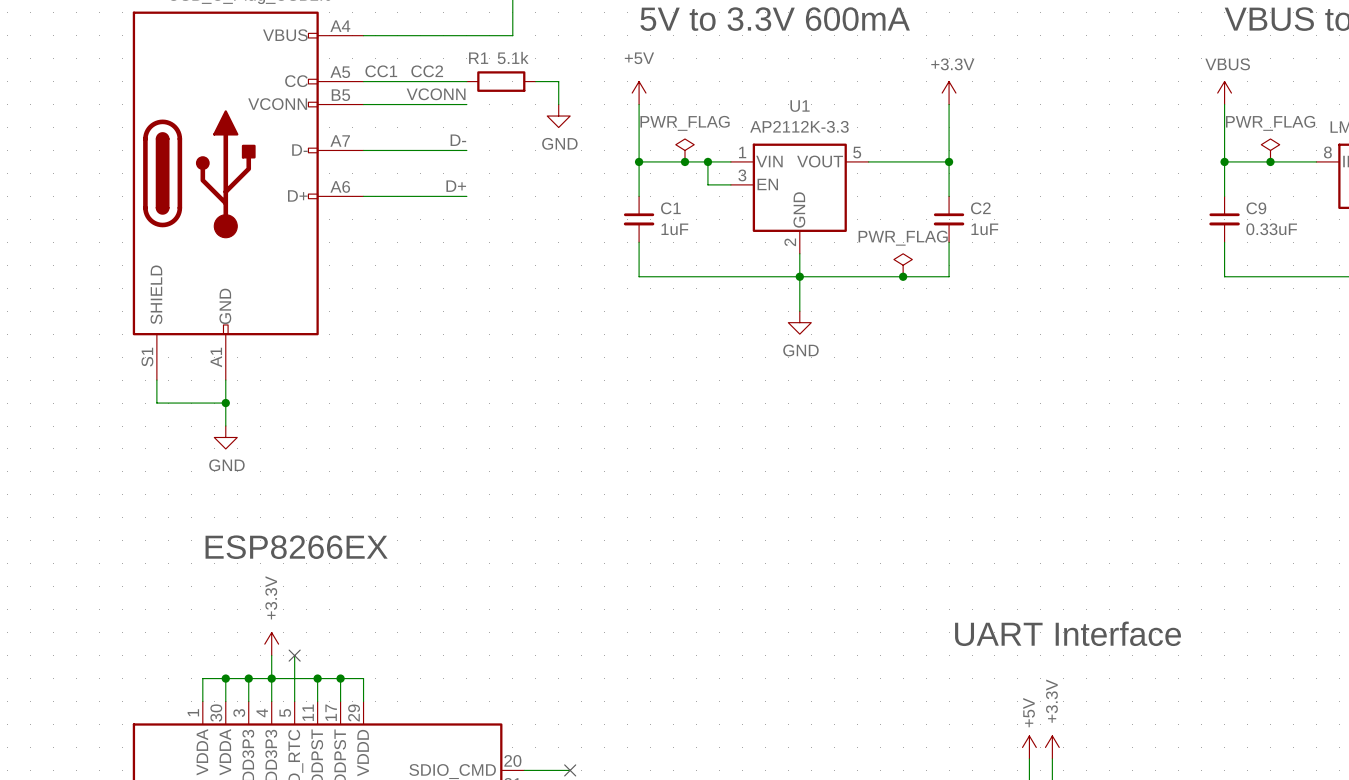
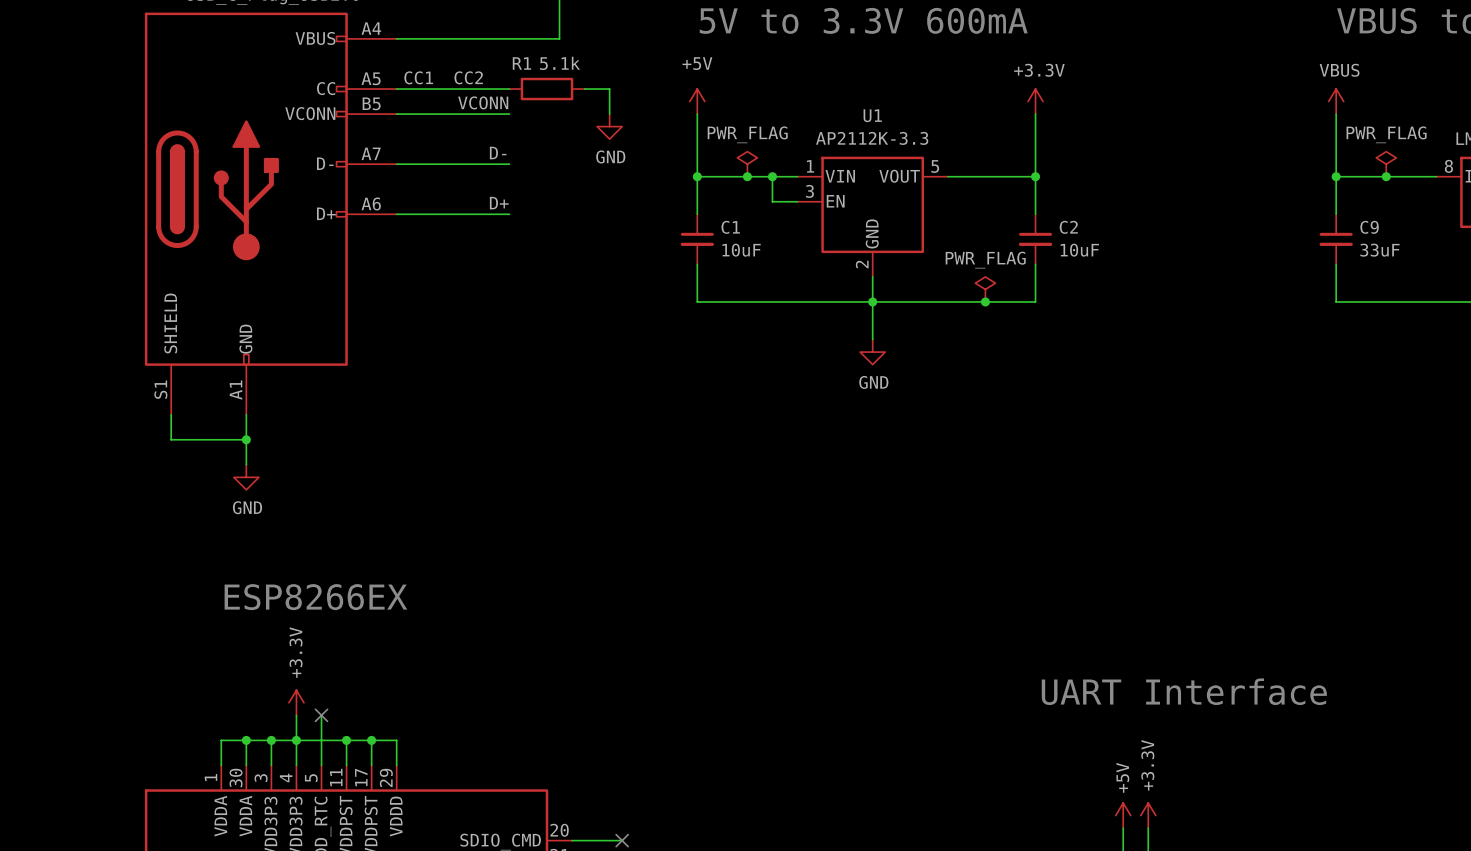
C1 value: 1uF (674, 229) -> 10uF (741, 250)
C2 value: 1uF (984, 229) -> 10uF (1079, 250)
C9 value: 0.33uF (1271, 229) -> 33uF (1379, 250)

